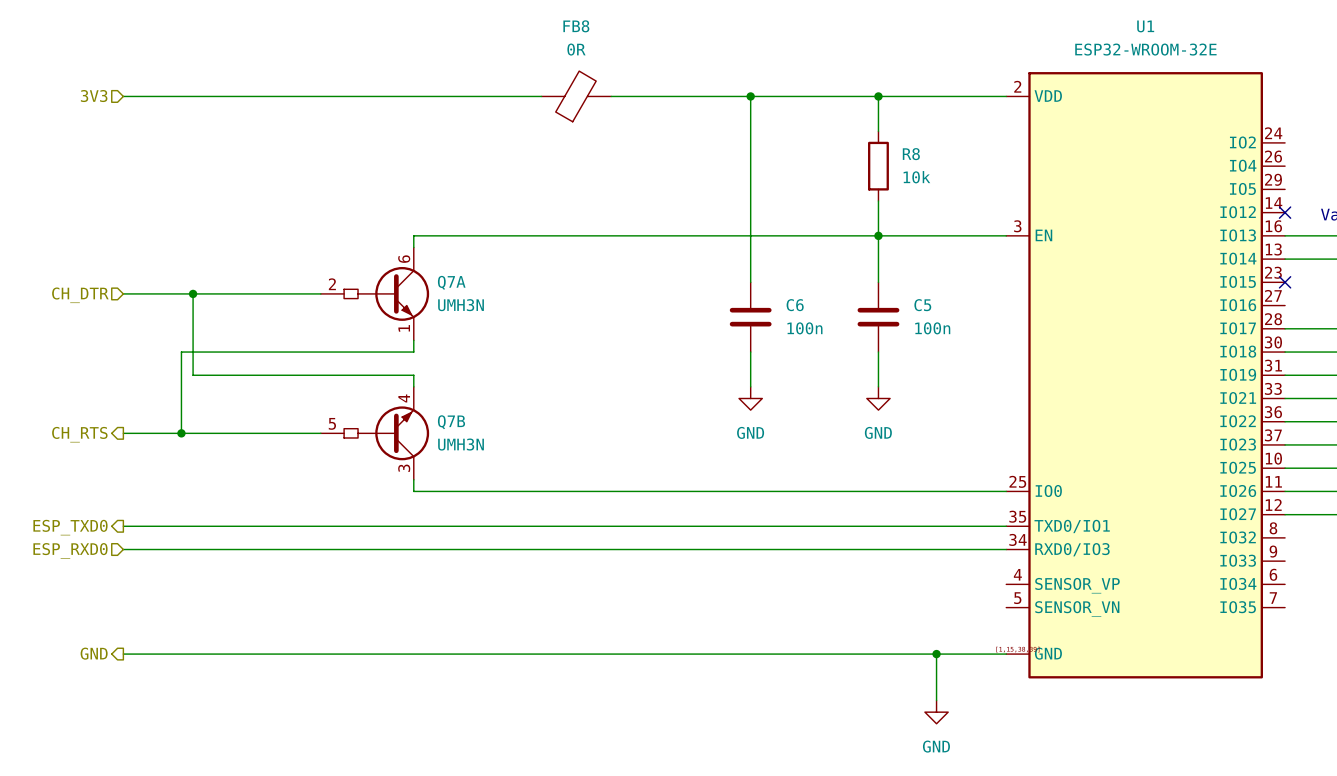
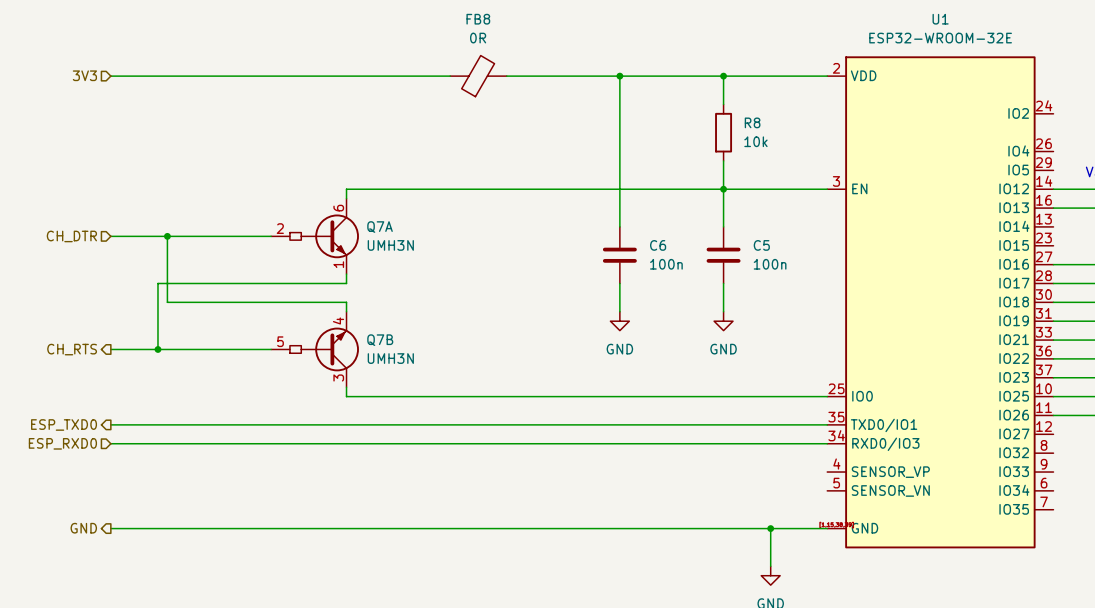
U1 symbol: [1006, 72, 1286, 679] -> [827, 56, 1054, 549]
no-connect mark: (1285, 212) -> none
no-connect mark: (1285, 282) -> none

